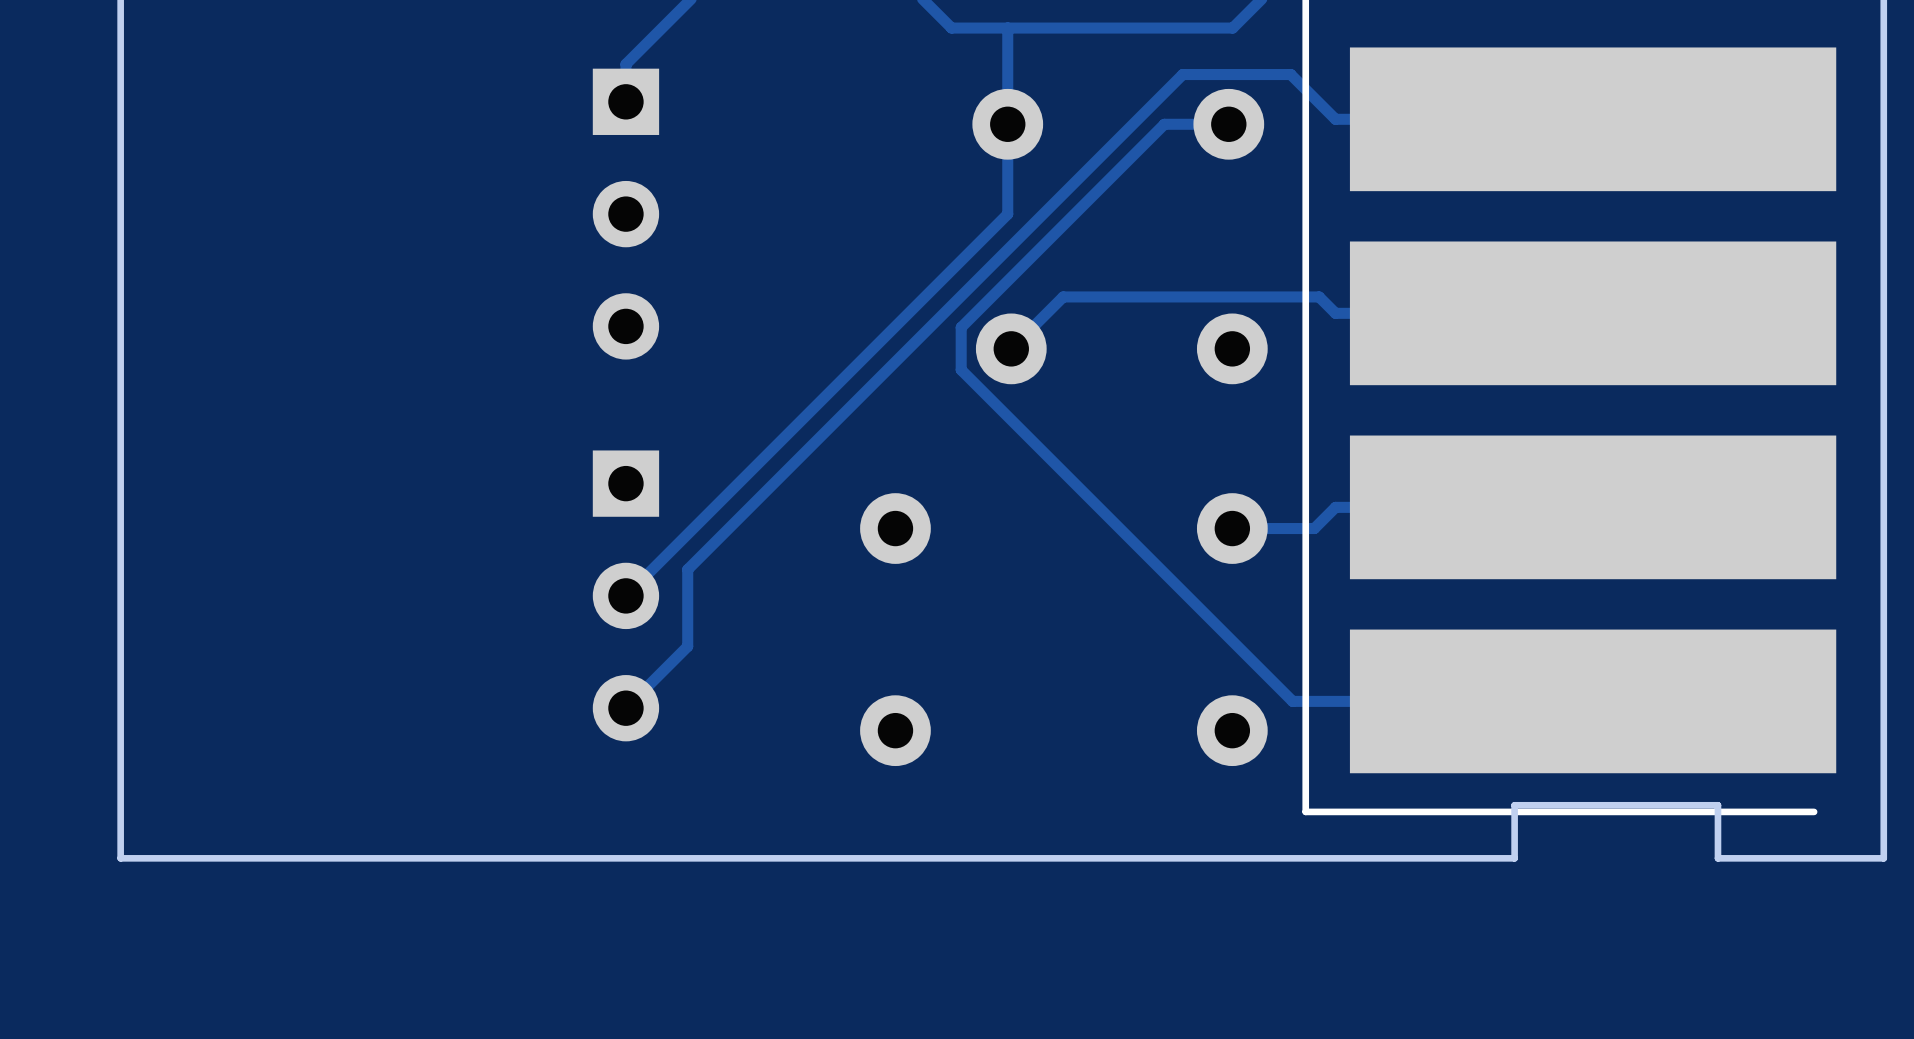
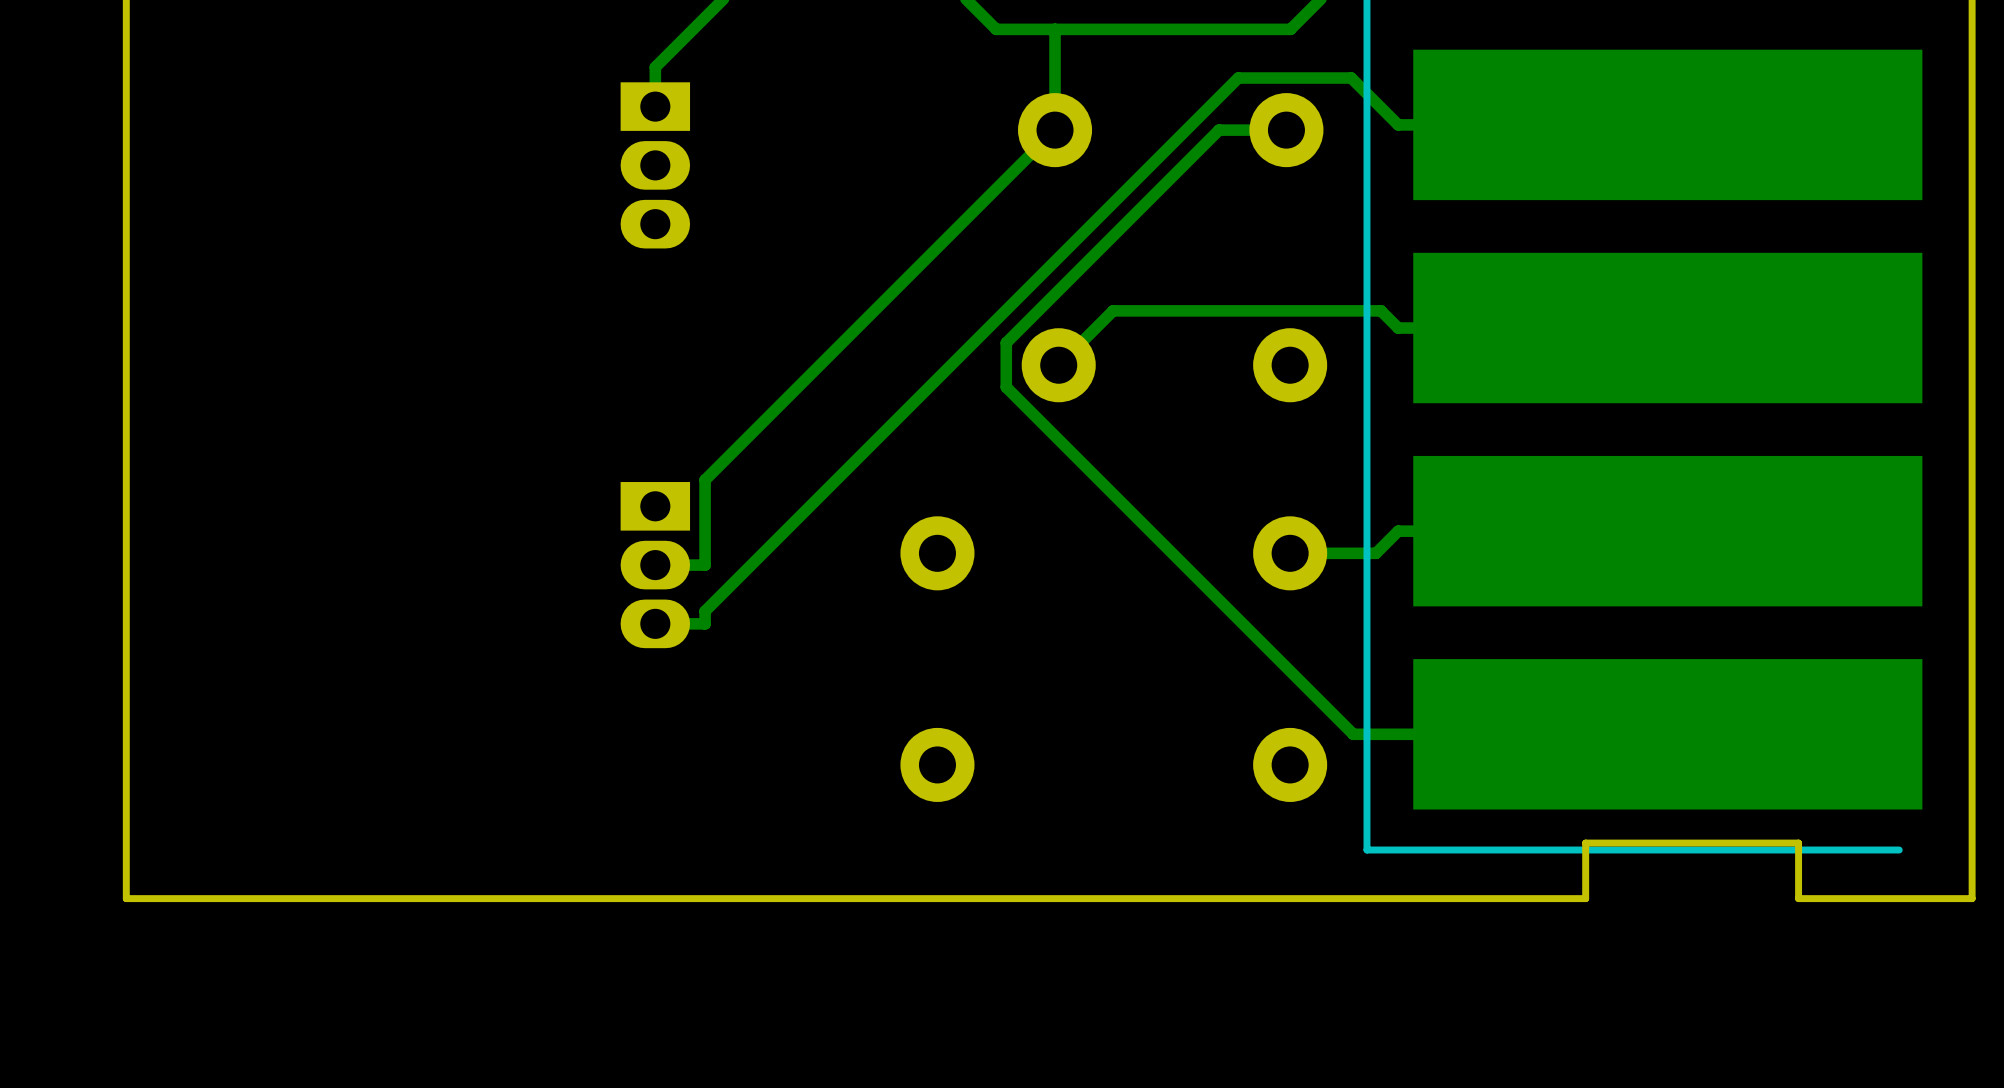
track: (1007, 124) (1007, 214) (625, 595) -> (1055, 130) (705, 480) (705, 565) (655, 565)
part: none -> (655, 165)
part: (625, 214) -> none
part: none -> (655, 565)
track: (687, 569) (687, 646) (625, 708) -> (719, 596) (705, 611) (705, 623) (655, 623)
part: (625, 595) -> none

